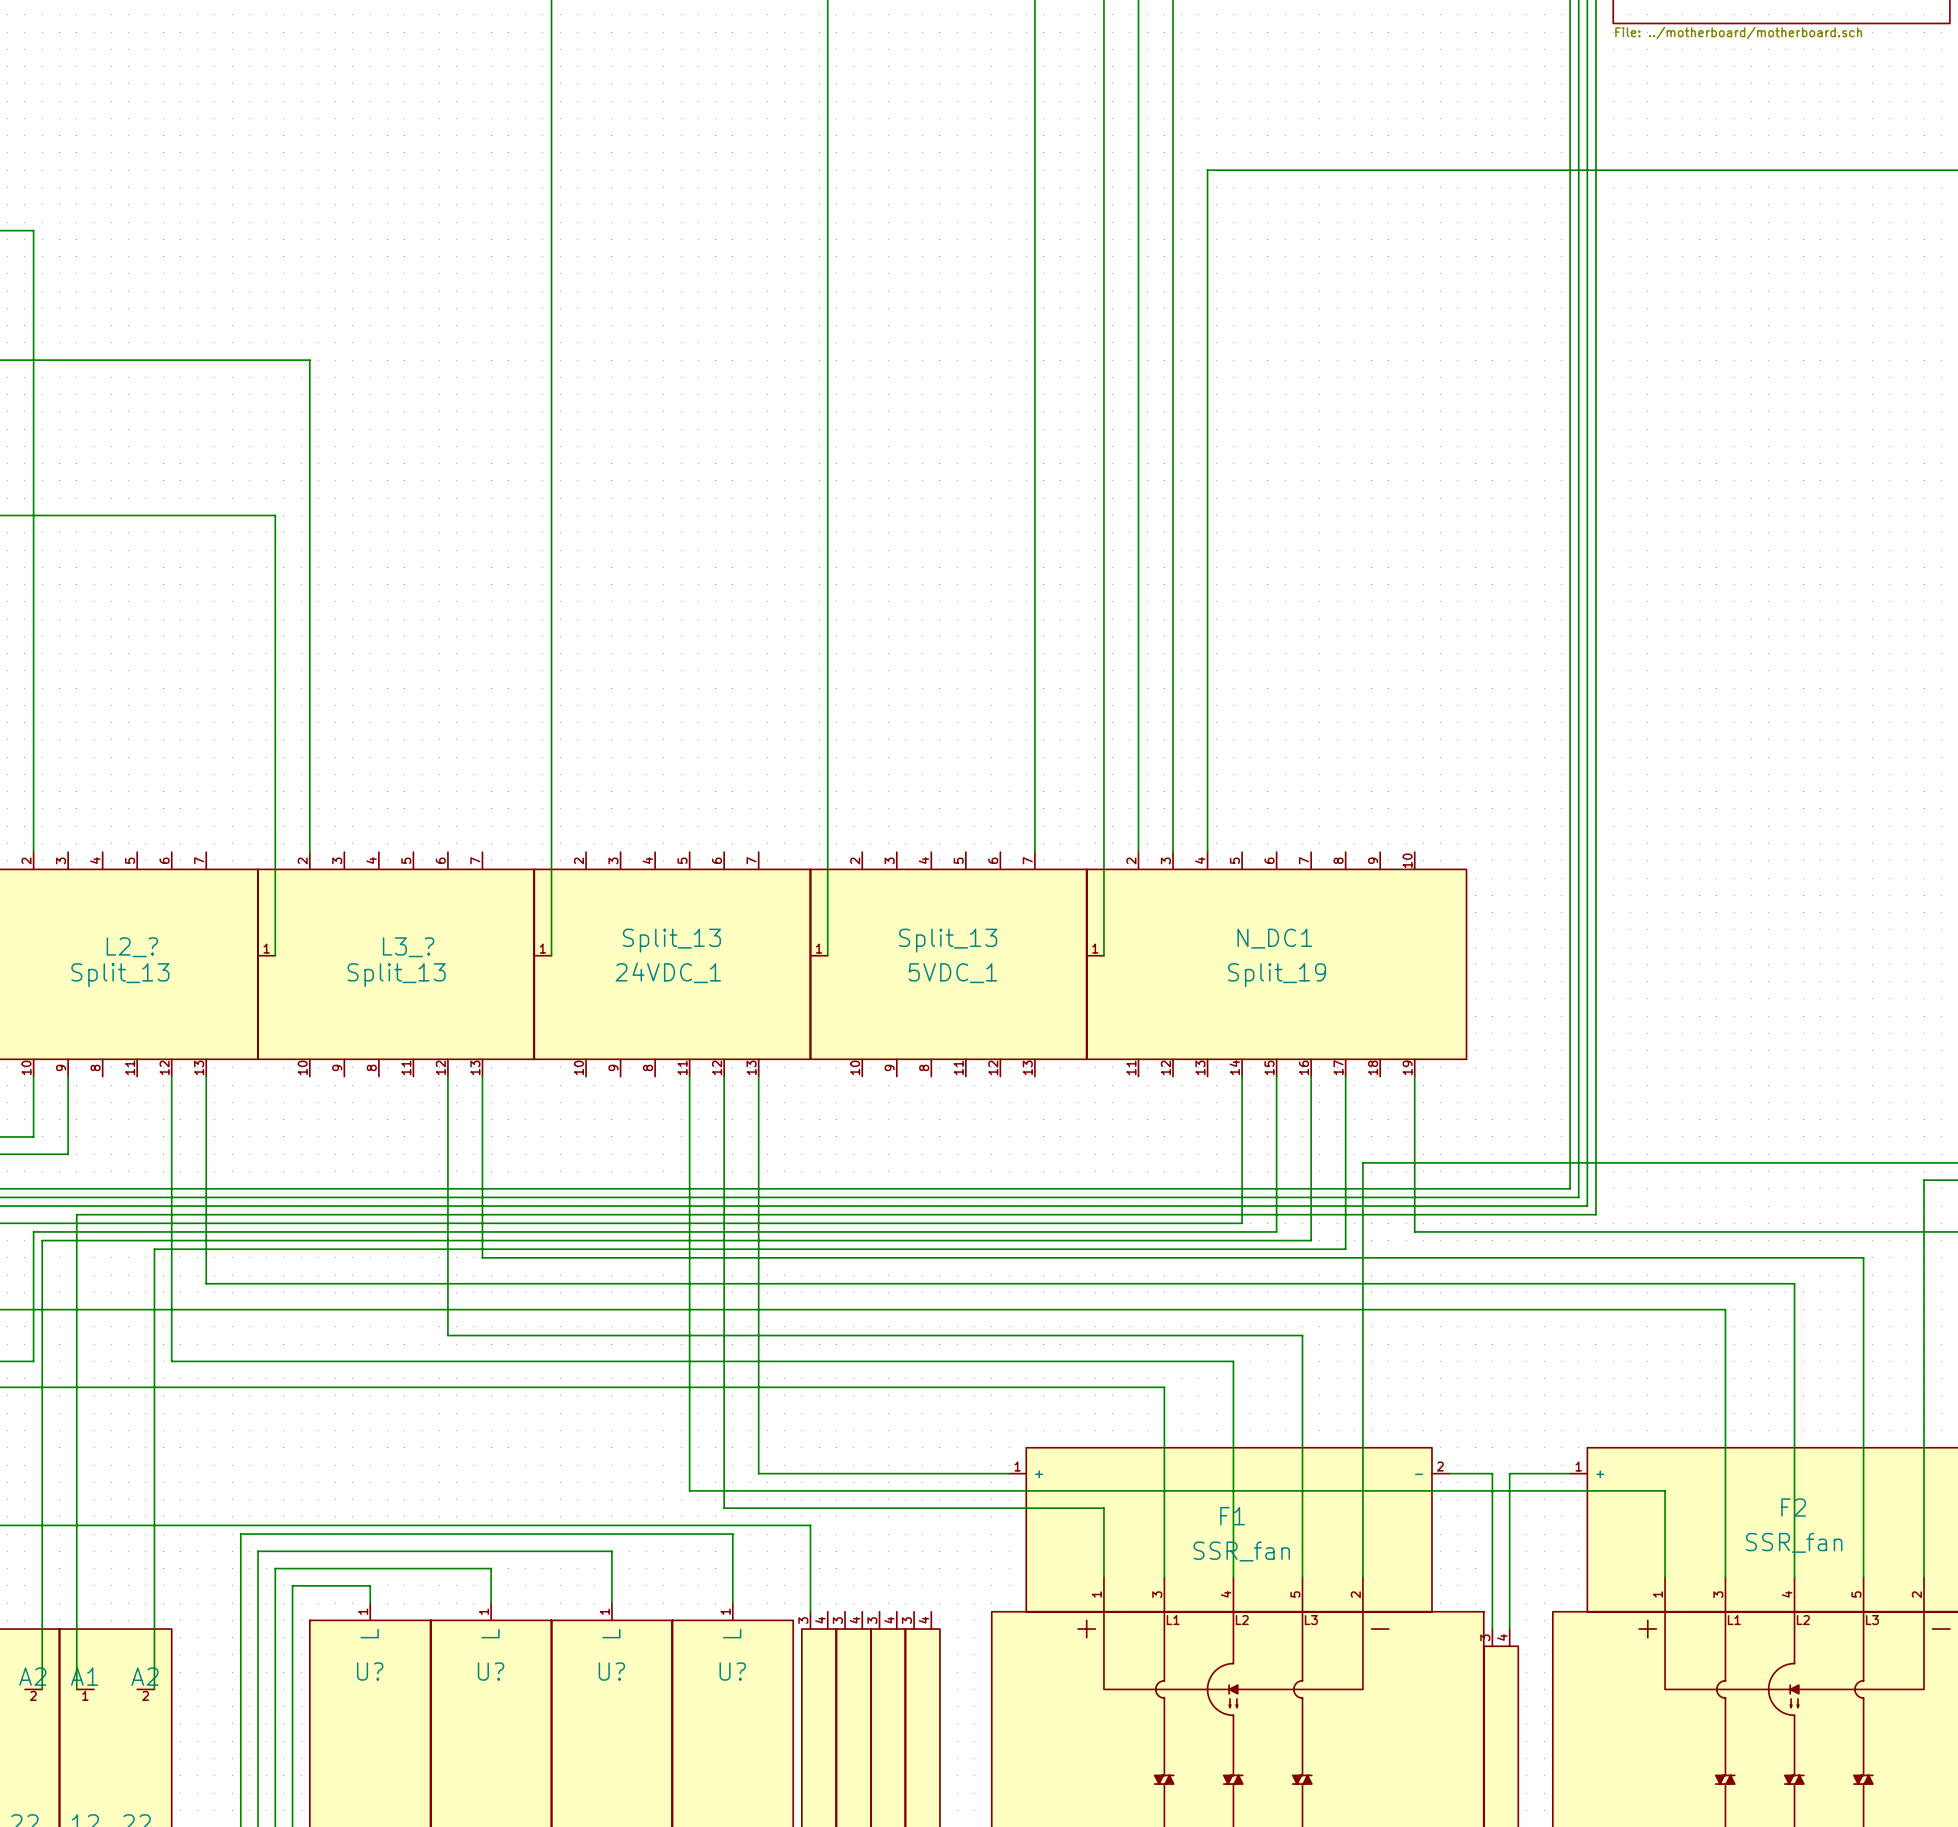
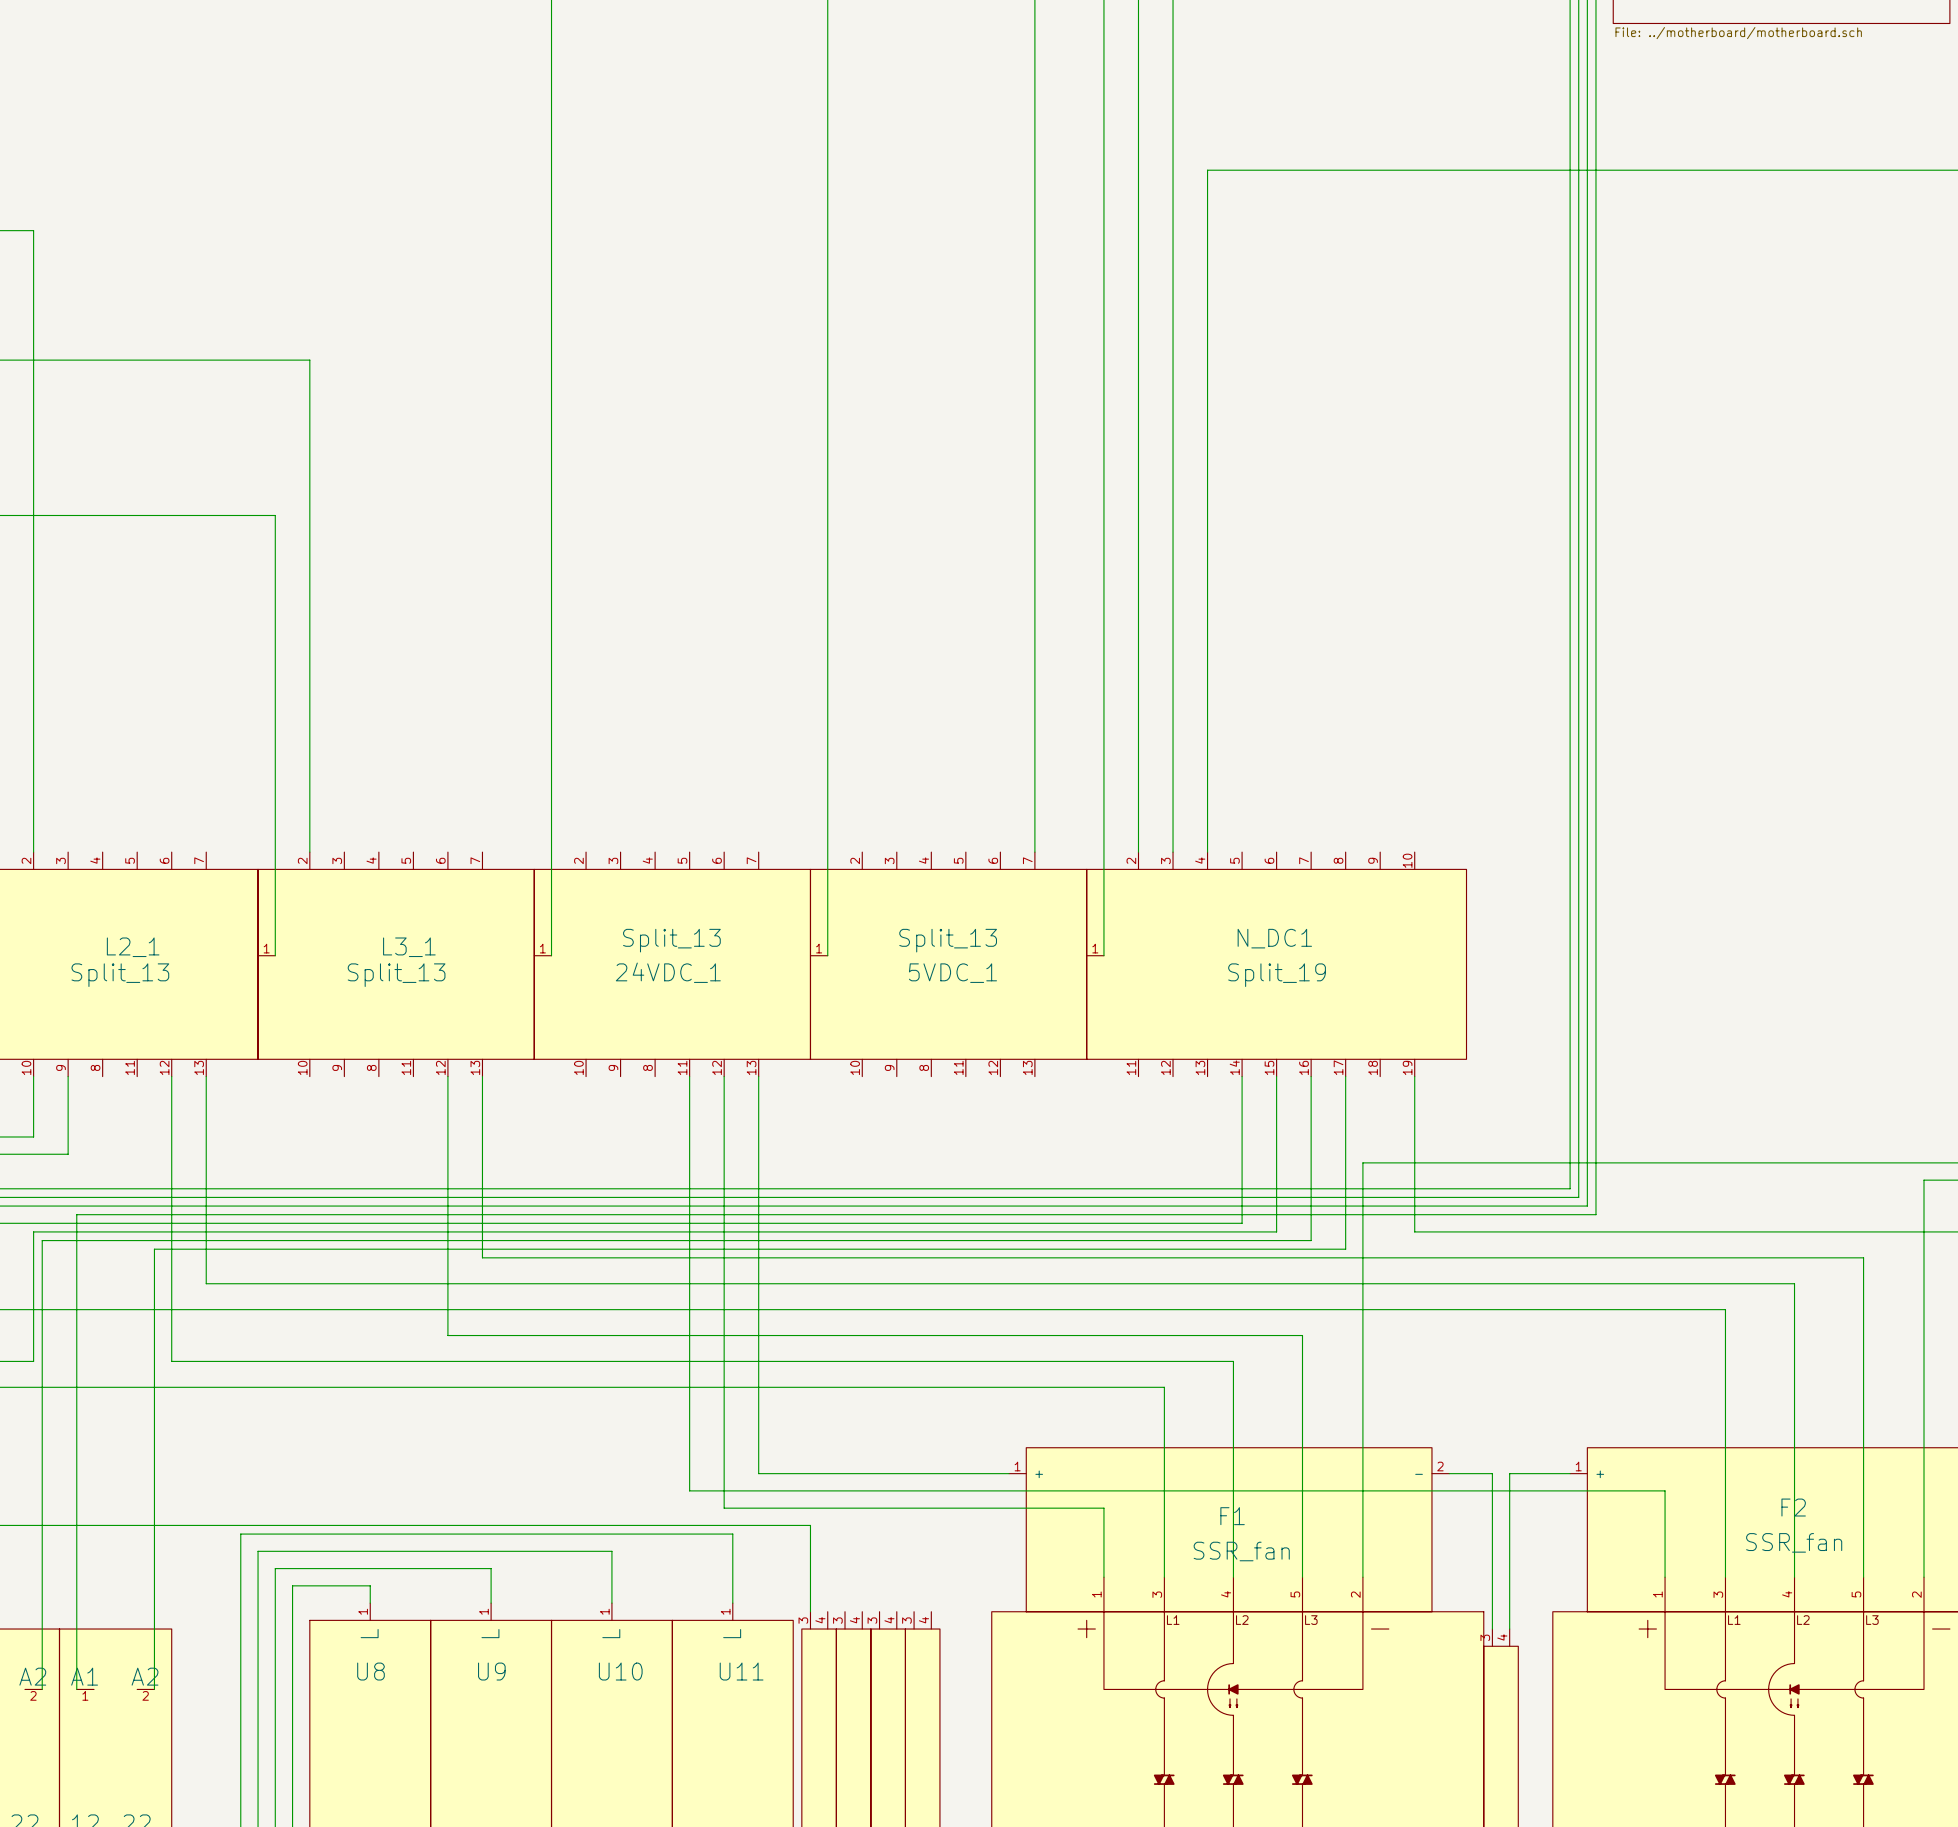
L2_? name: L2_? (132, 947) -> L2_1 (133, 947)
L3_? name: L3_? (408, 947) -> L3_1 (409, 947)
U? name: U? (370, 1671) -> U8 (370, 1671)
U? name: U? (491, 1671) -> U9 (491, 1671)
U? name: U? (611, 1671) -> U10 (620, 1671)
U? name: U? (732, 1671) -> U11 (741, 1671)

